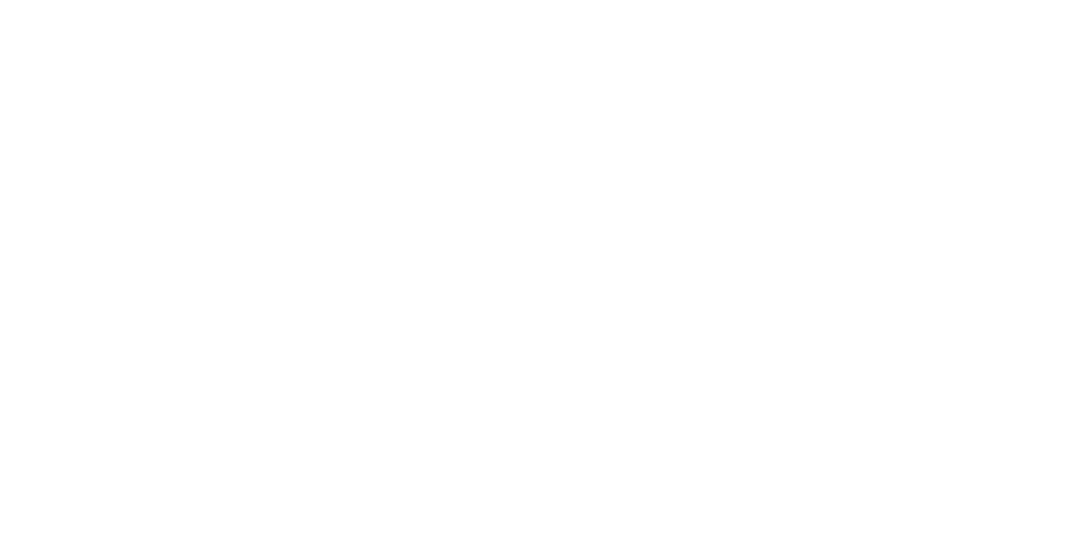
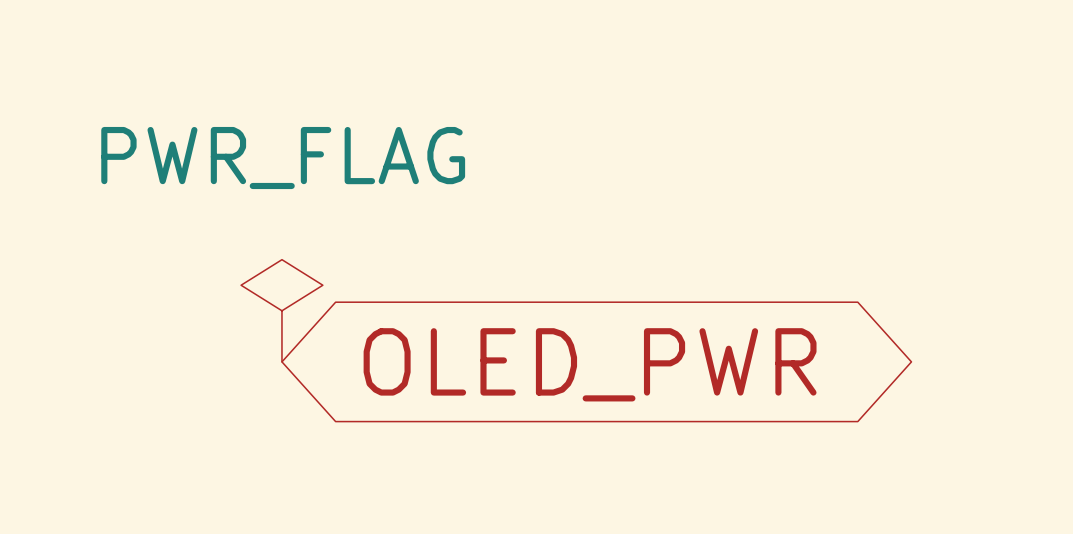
power symbol: none -> PWR_FLAG (281, 310)
global label: none -> OLED_PWR (590, 364)

